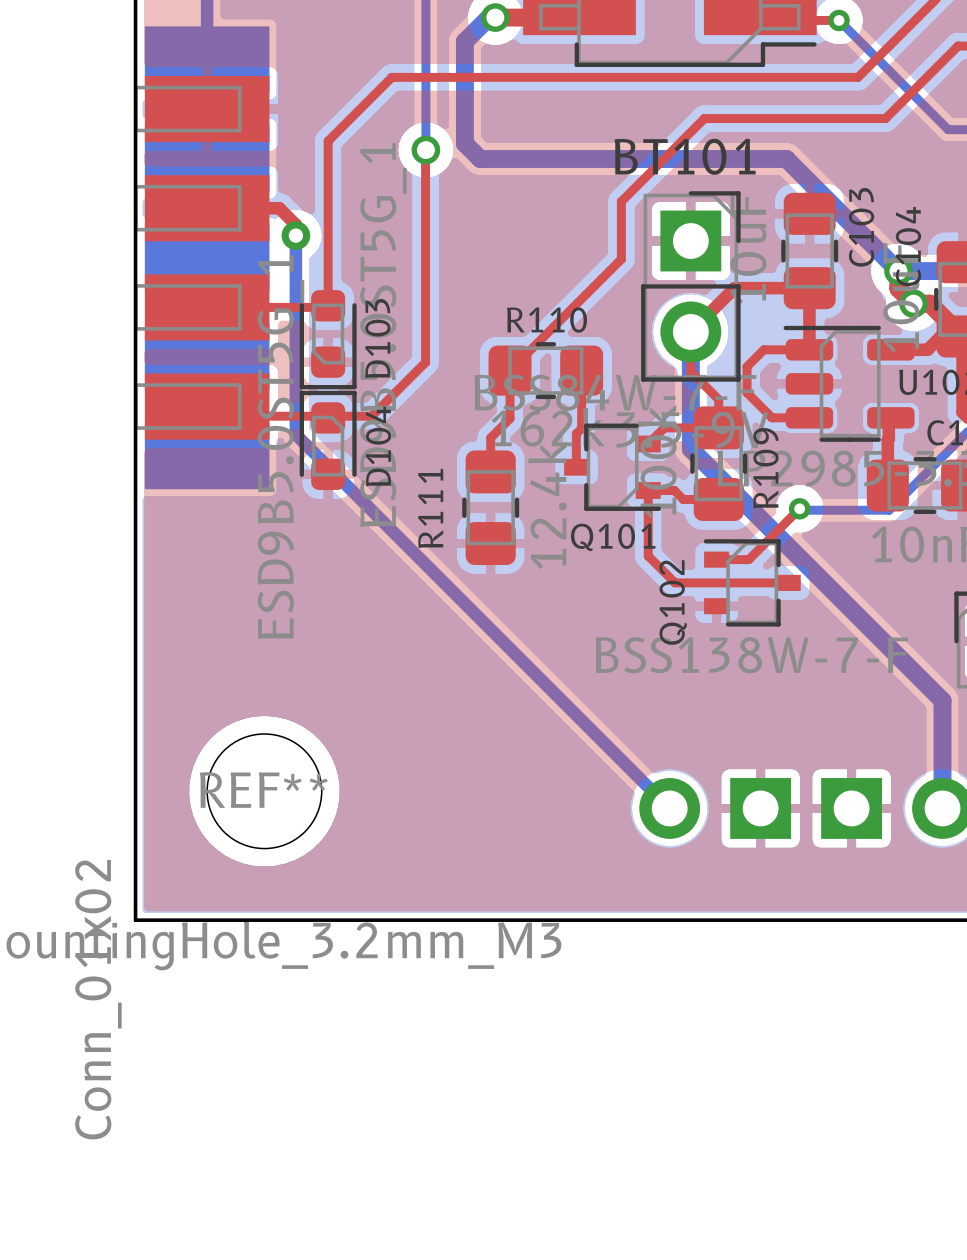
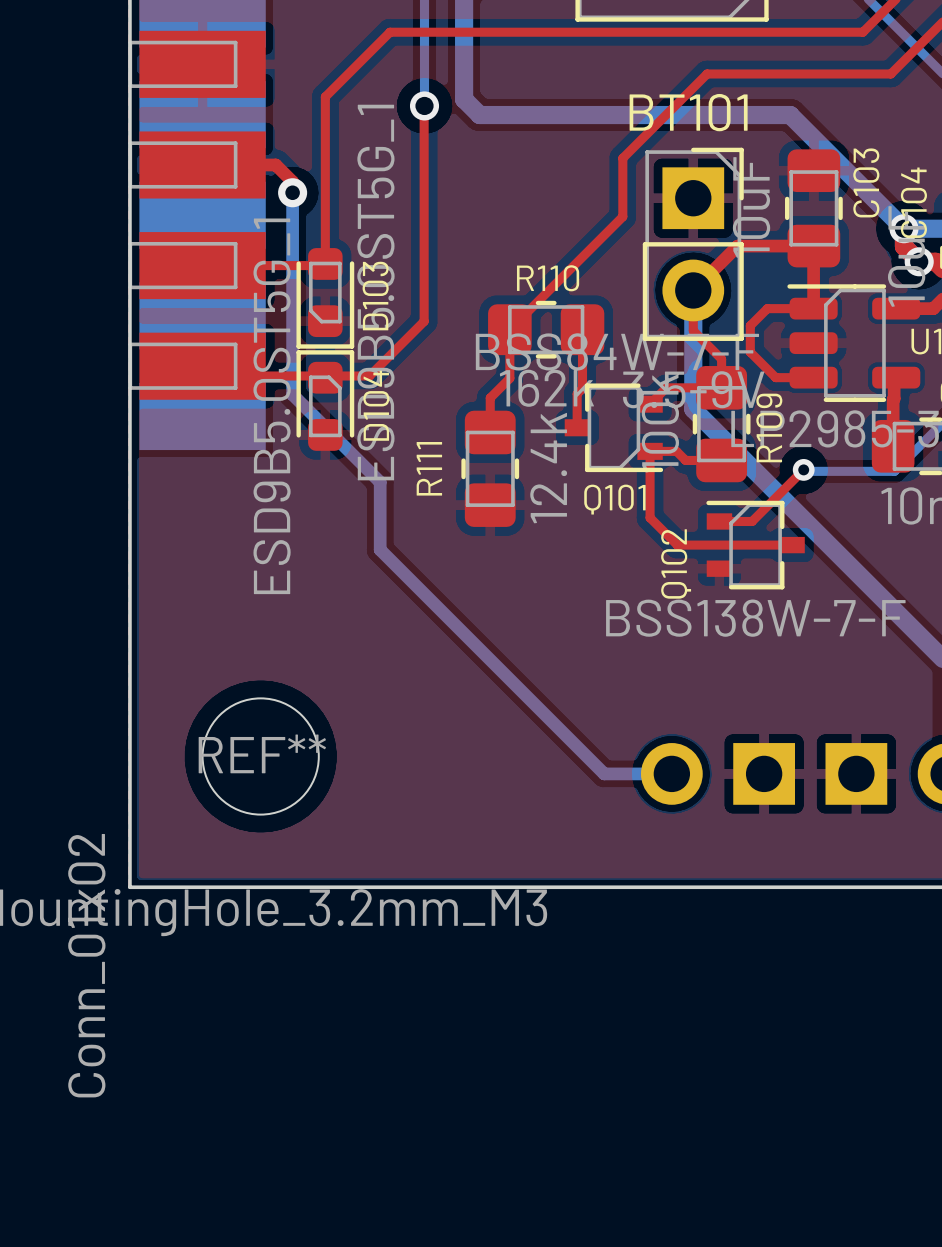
bottom track: (382, 520) (669, 808) -> (380, 482) (380, 549) (604, 773) (671, 773)

